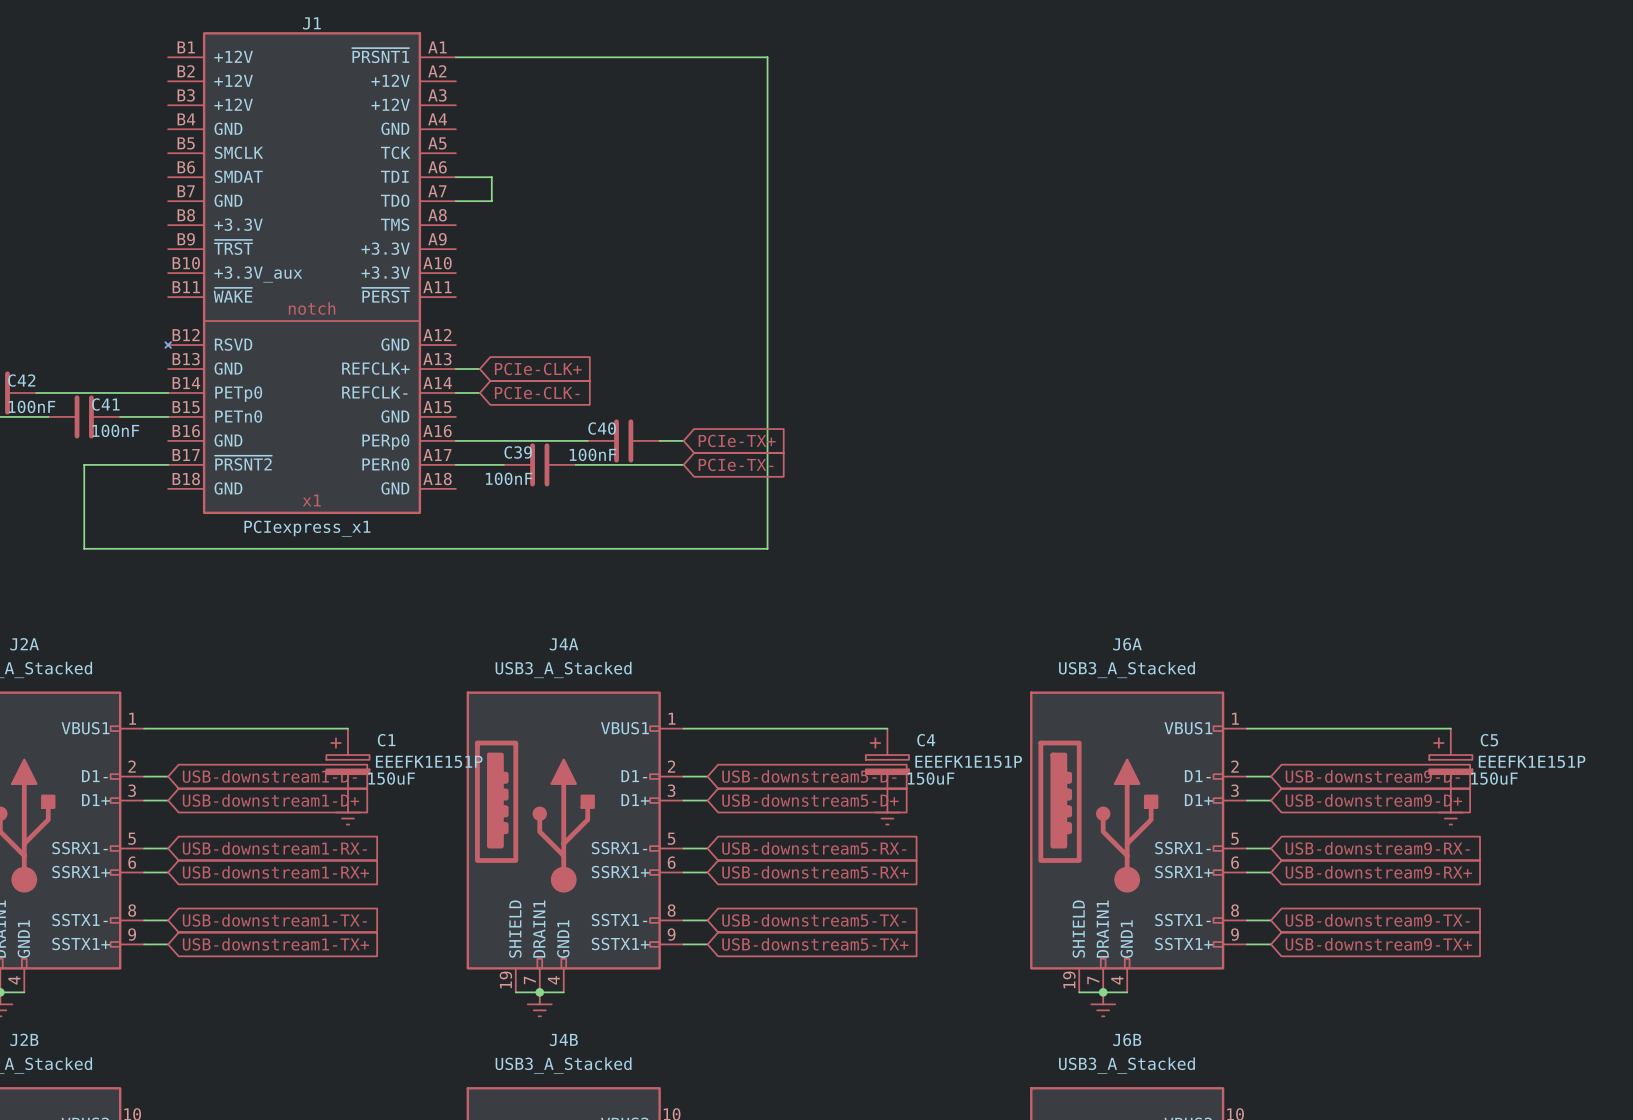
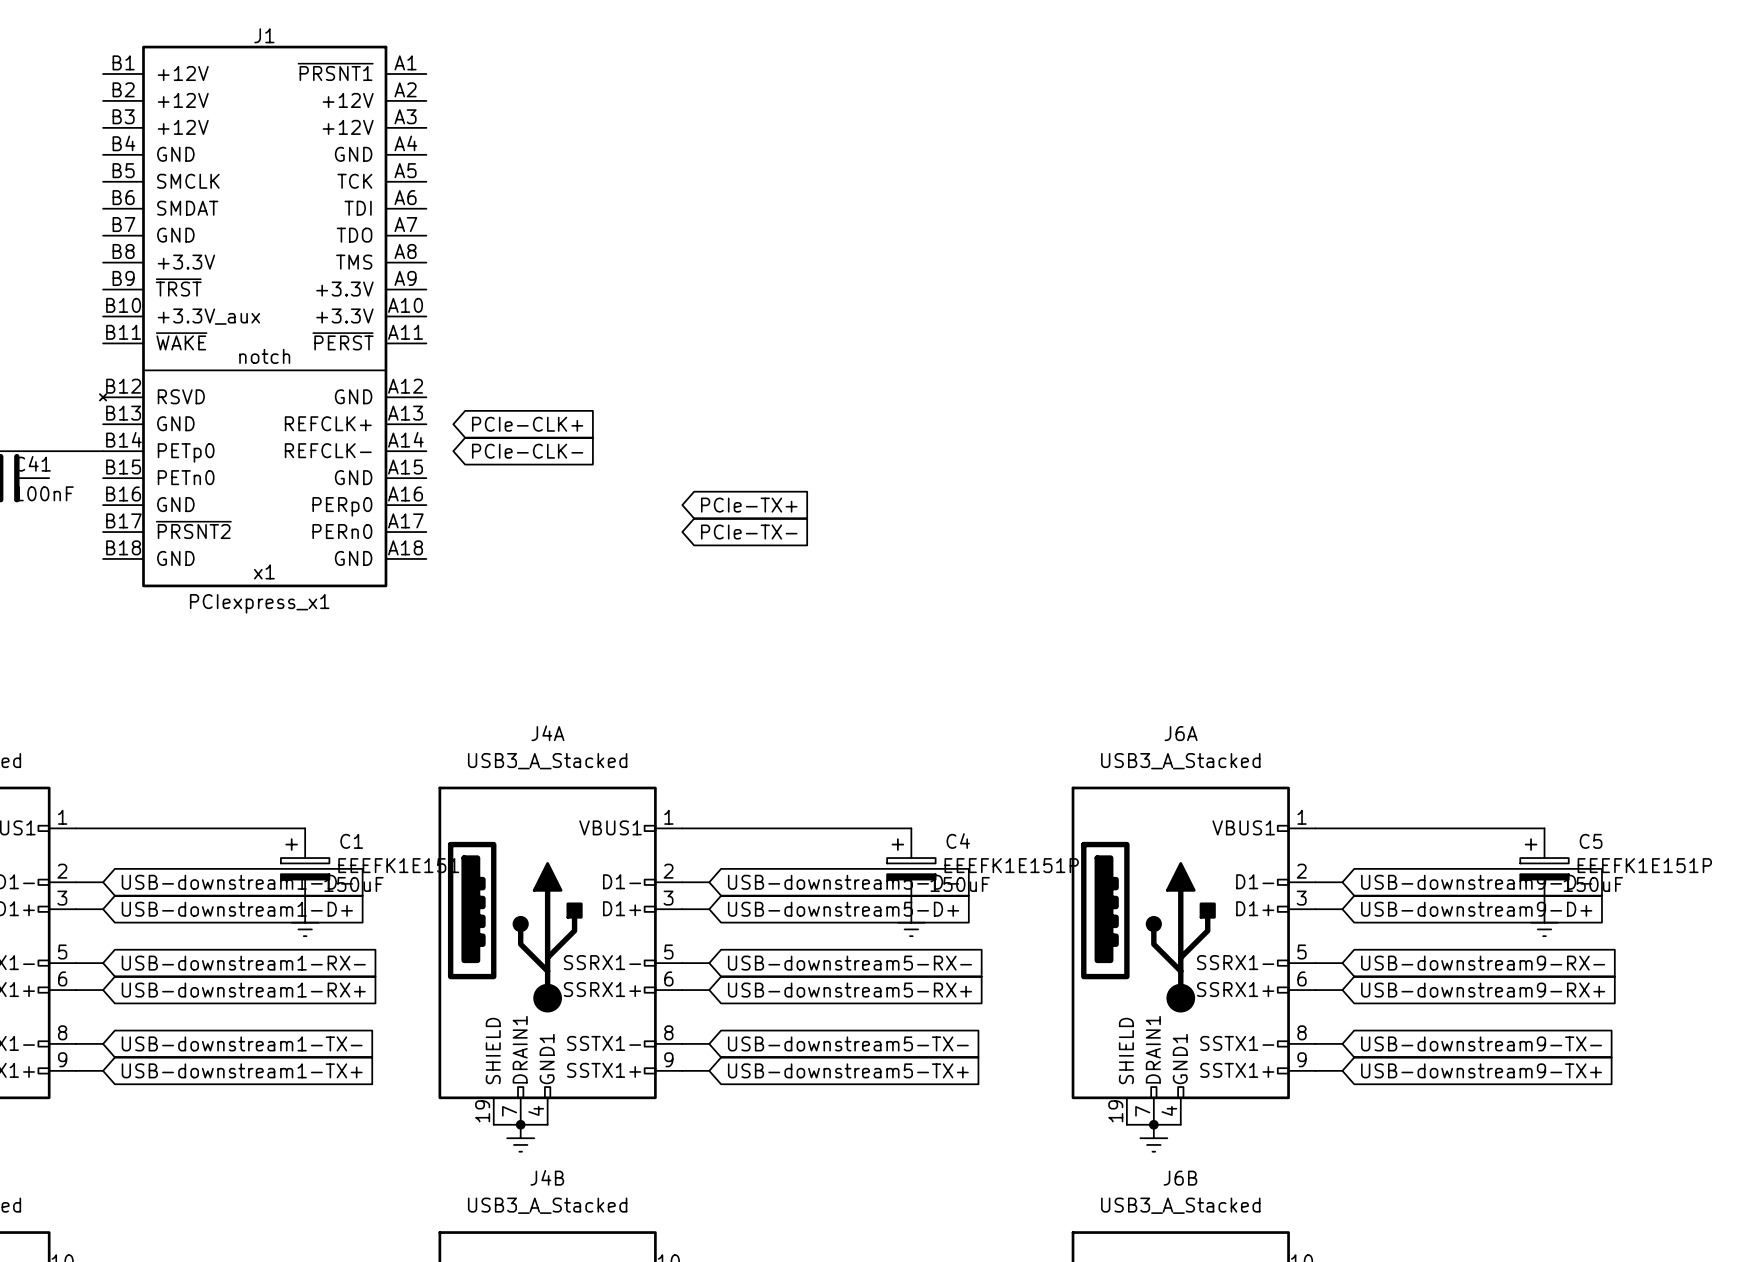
wire: (455, 57) (767, 57) (767, 548) (84, 548) (84, 464) (168, 464) -> none
wire: (455, 177) (491, 177) (491, 201) (455, 201) -> none
wire: (455, 369) (479, 369) -> none
wire: (455, 392) (479, 392) -> none
wire: (120, 416) (168, 416) -> none
wire: (455, 440) (587, 440) -> none
C40: 100nF (623, 440) -> none
wire: (659, 440) (683, 440) -> none
wire: (455, 464) (503, 464) -> none
C39: 100nF (539, 464) -> none
wire: (575, 464) (683, 464) -> none

